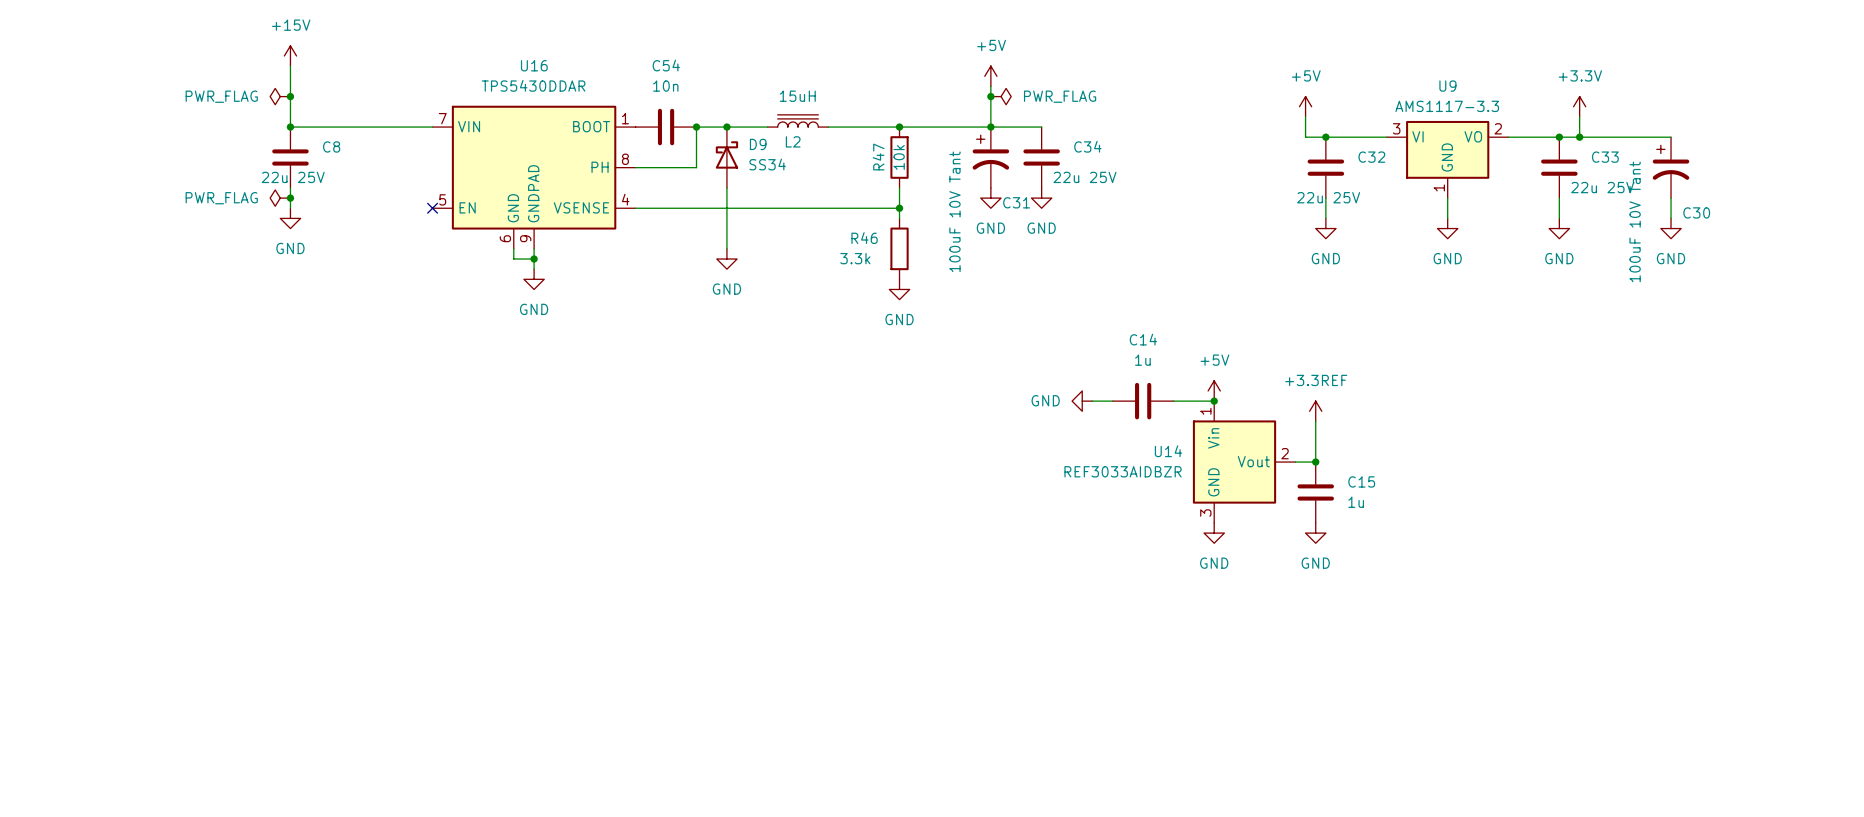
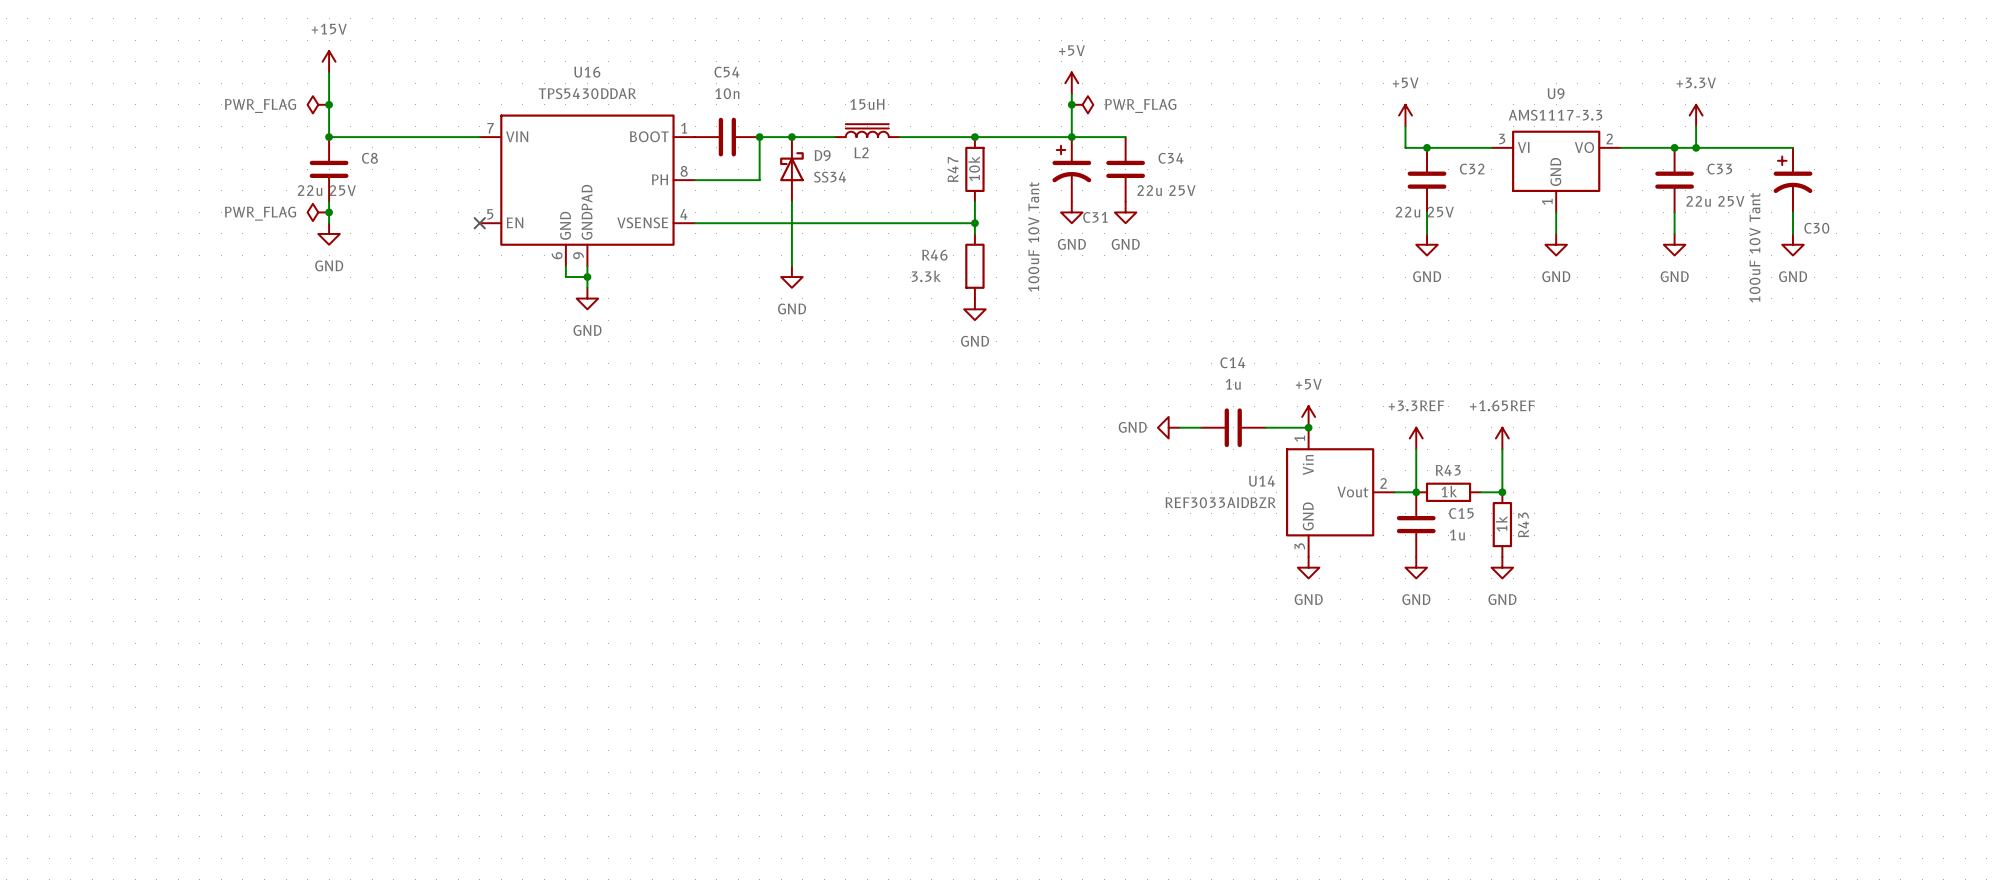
power symbol: none -> +1.65REF (1502, 438)
wire: none -> (1502, 449) (1502, 492) (1480, 492)
R43: none -> 1k (1448, 492)
junction: none -> (1502, 492)
R43: none -> 1k (1502, 524)
power symbol: none -> GND (1502, 567)

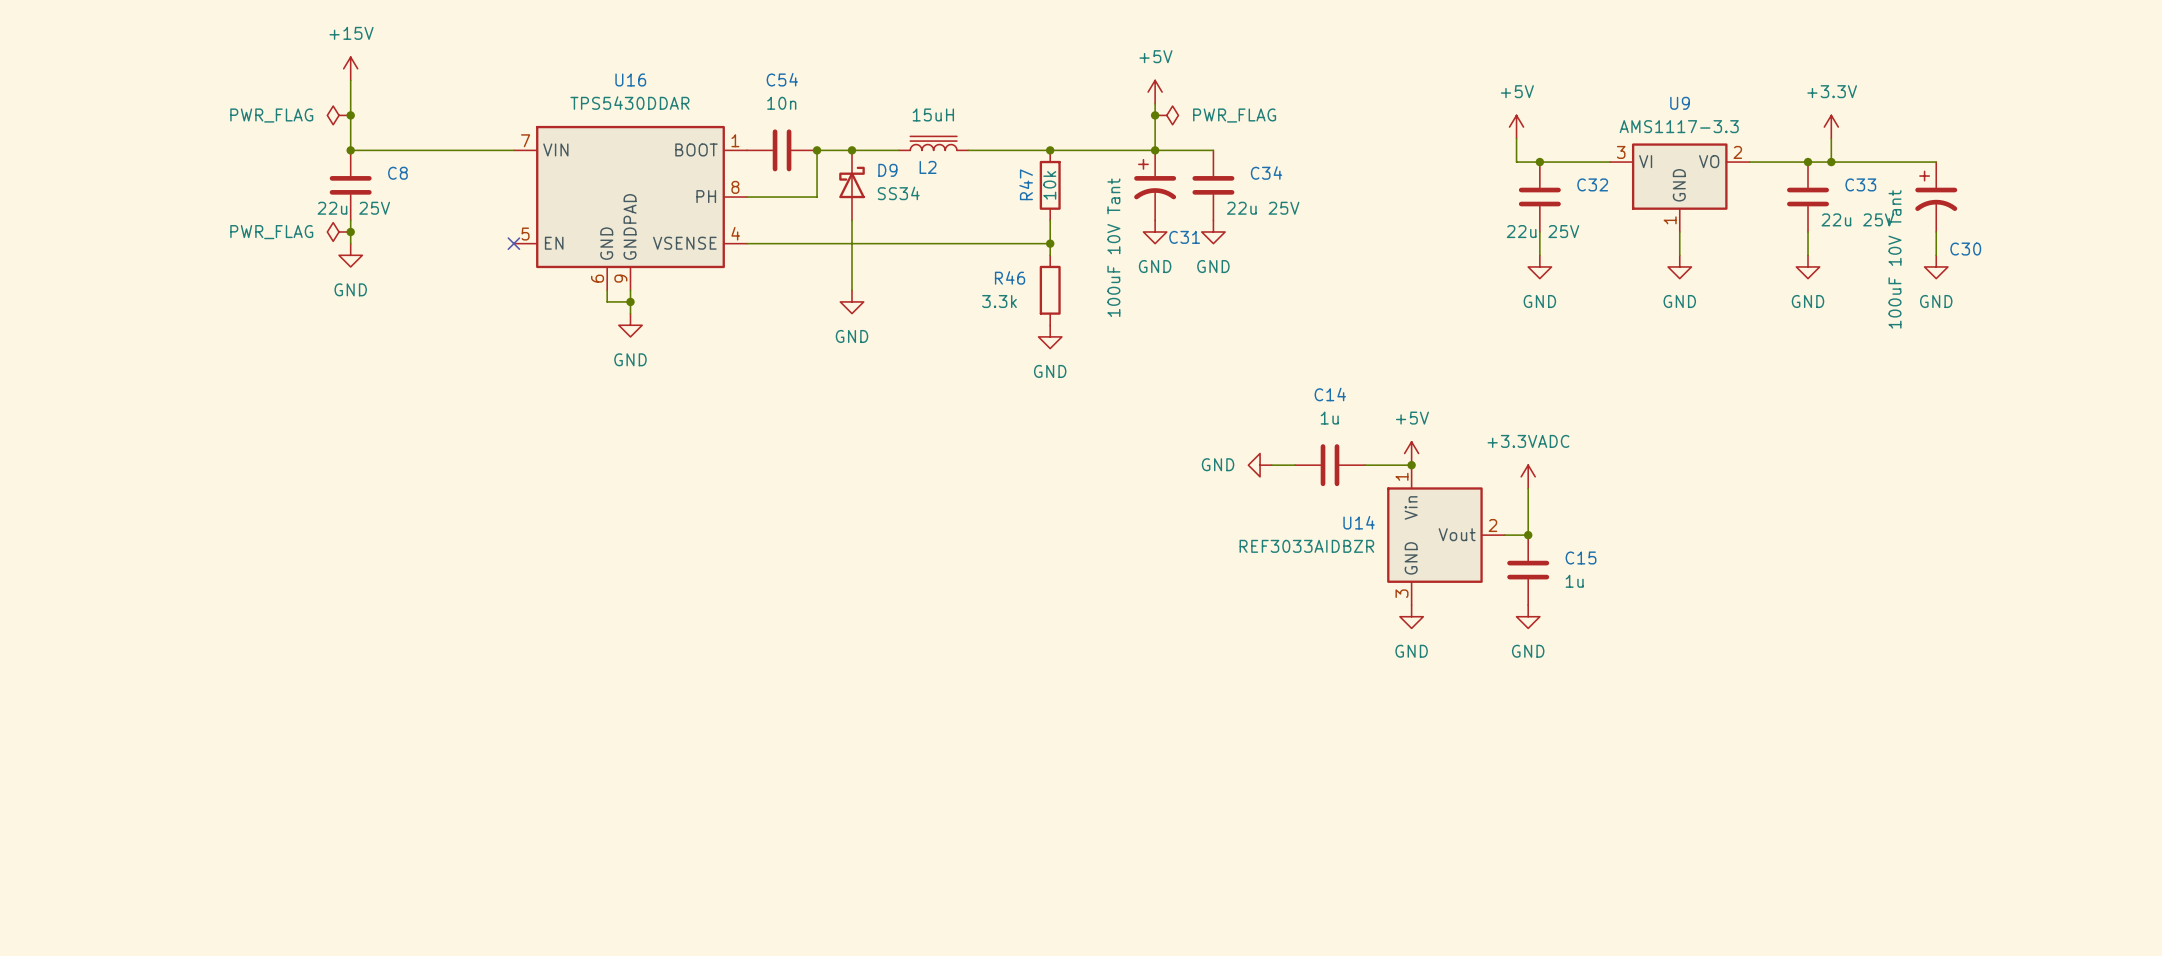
power symbol: +3.3REF (1416, 438) -> +3.3VADC (1528, 476)
power symbol: +1.65REF (1502, 438) -> none
wire: (1502, 449) (1502, 492) (1480, 492) -> none
R43: 1k (1448, 492) -> none
junction: (1502, 492) -> none
R43: 1k (1502, 524) -> none
power symbol: GND (1502, 567) -> none

